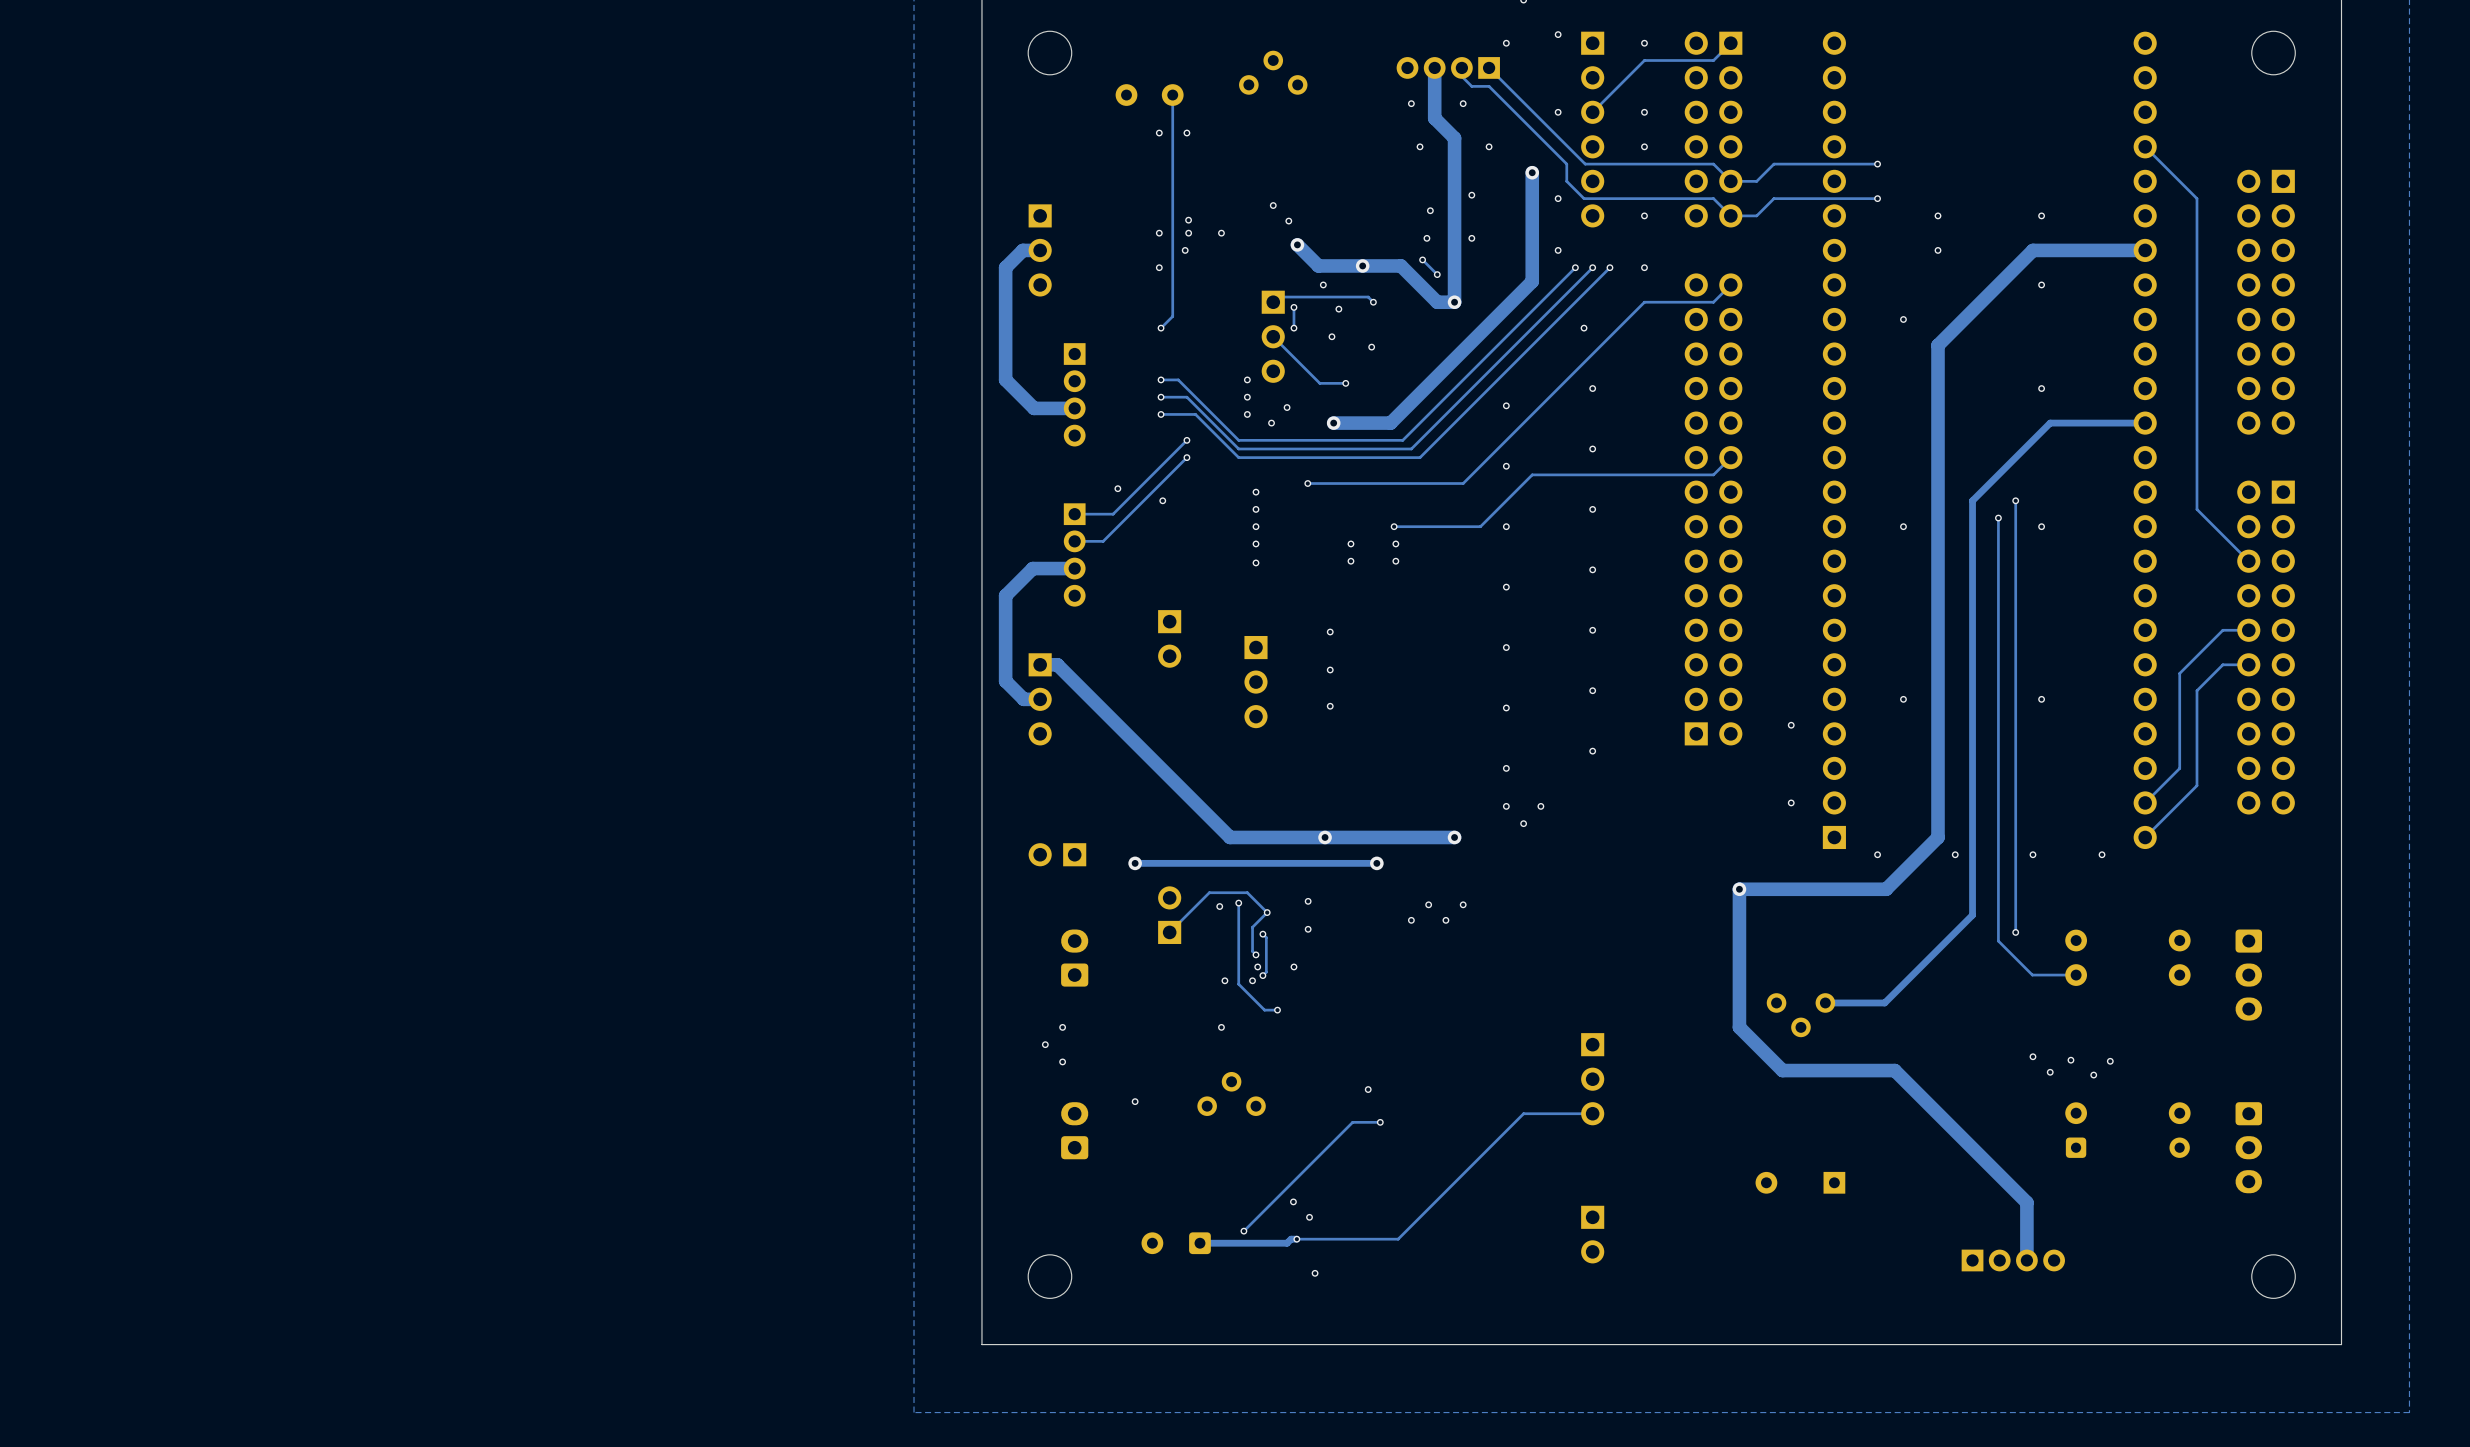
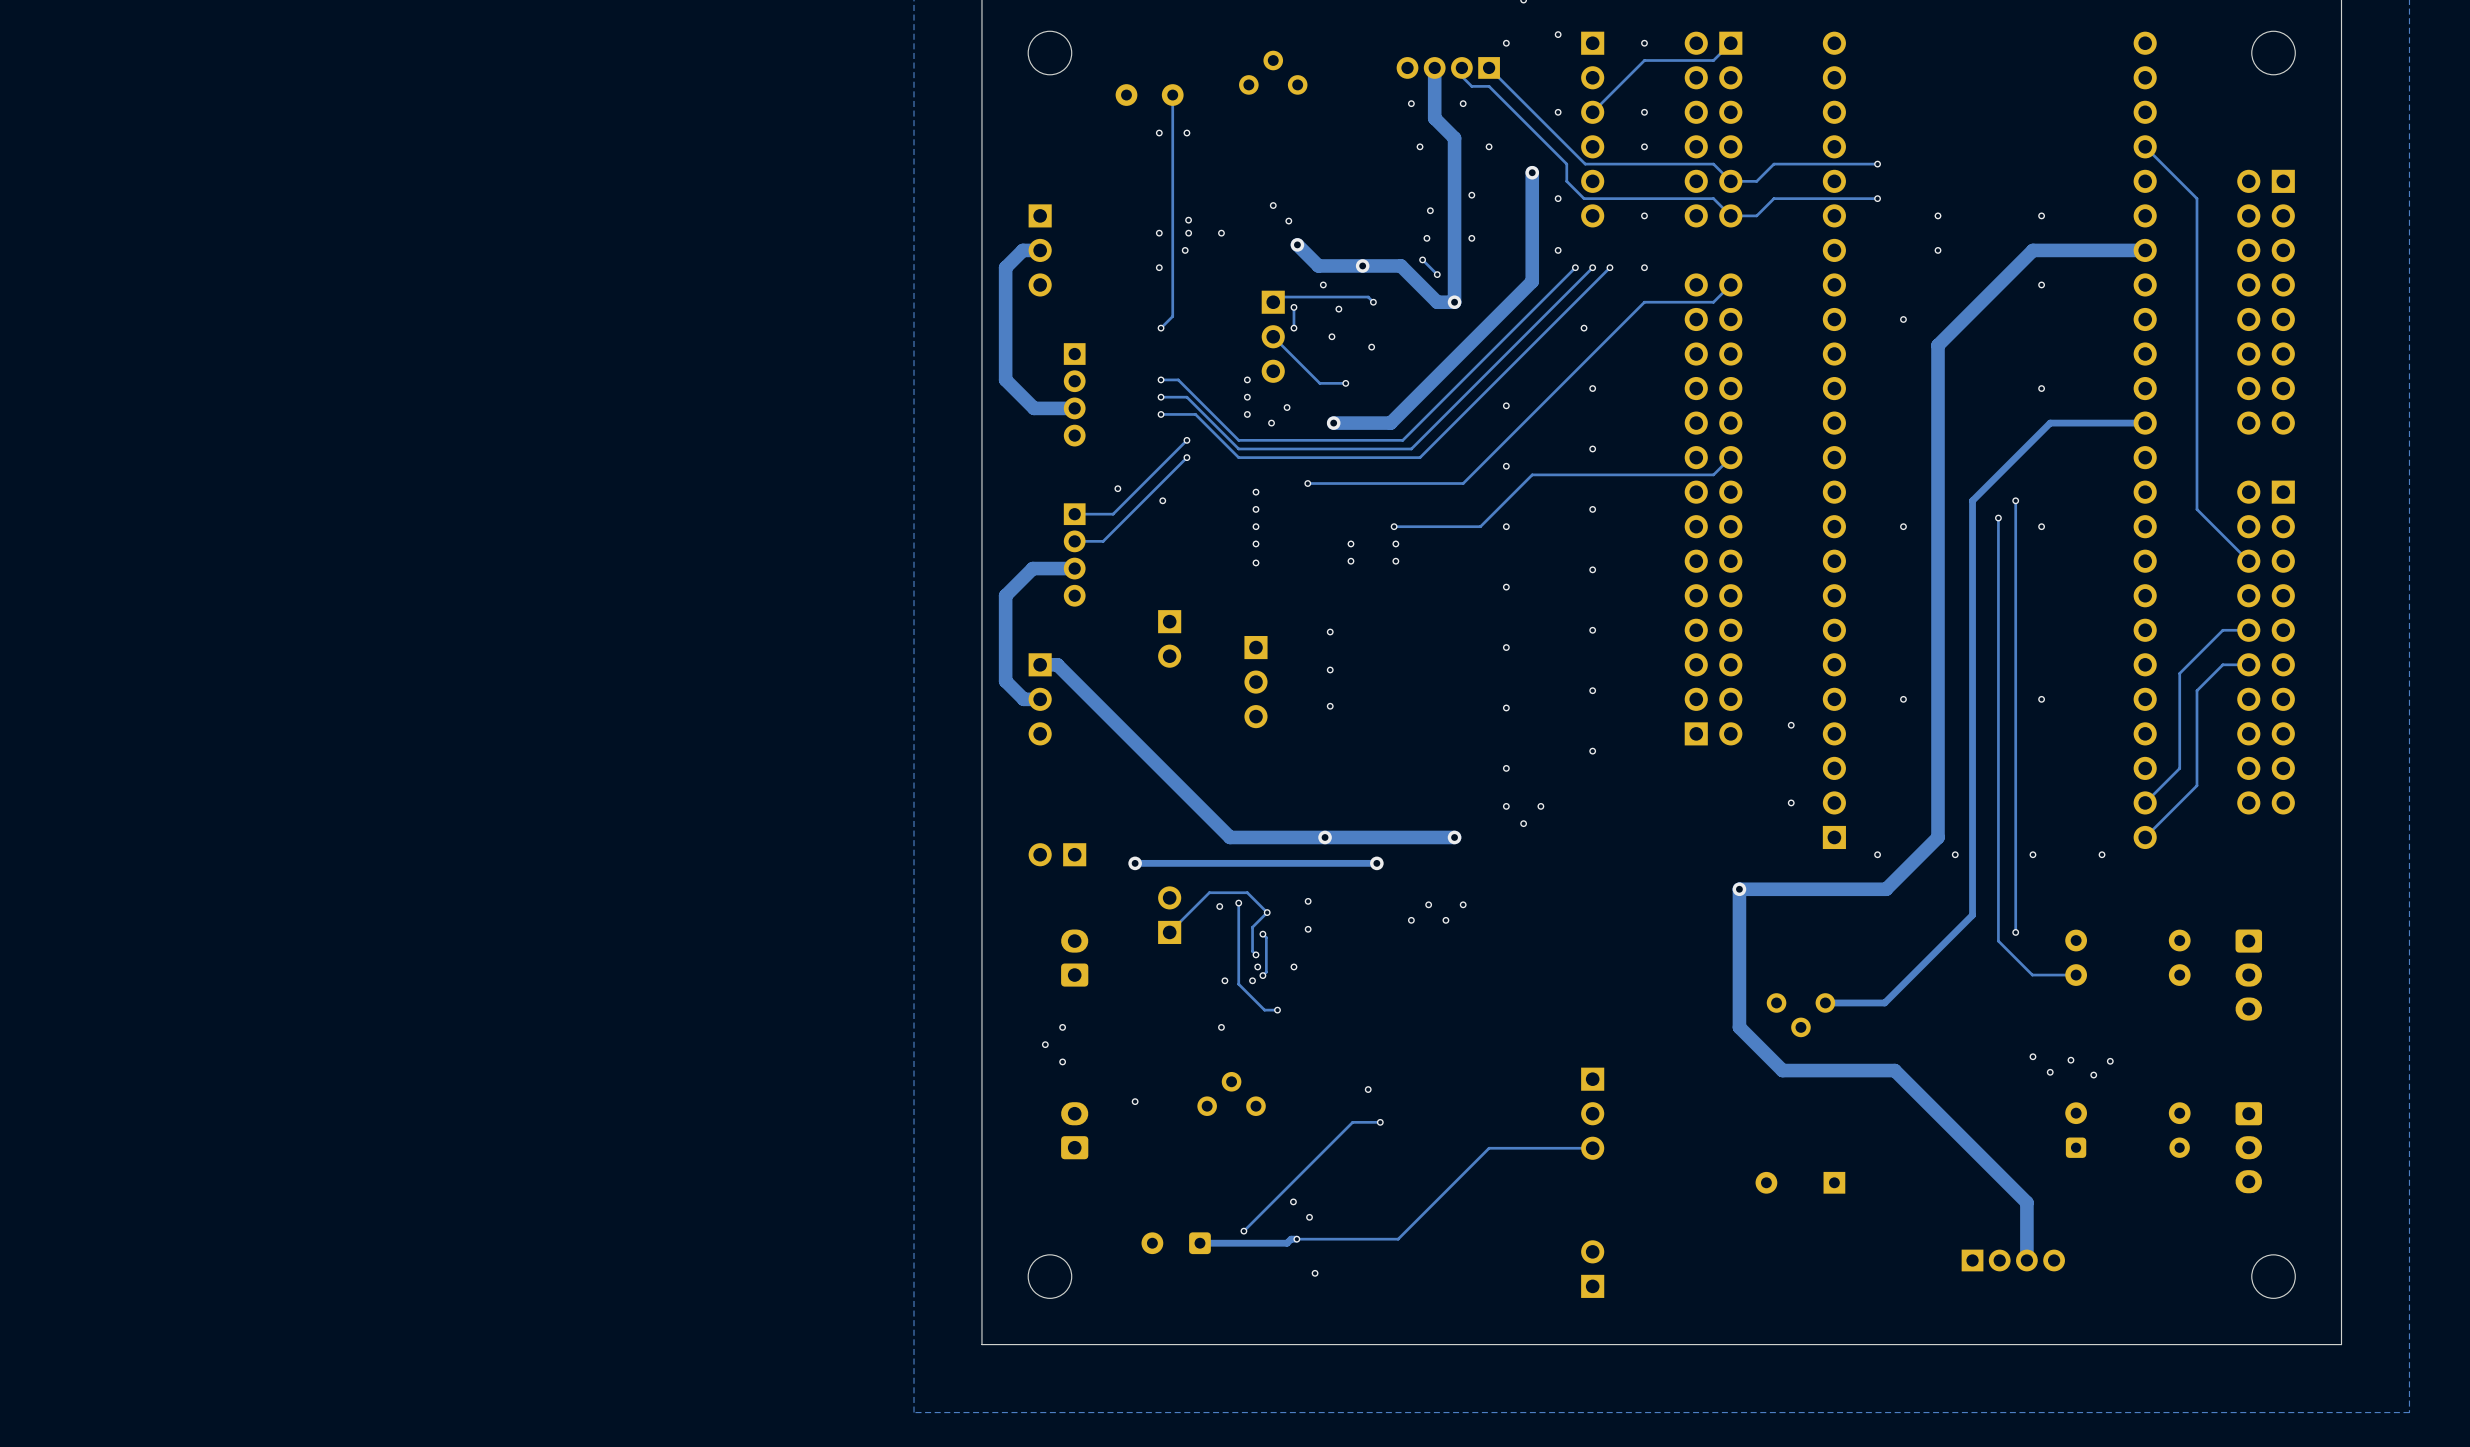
part position: (1592, 1079) -> (1592, 1113)
track: (1592, 1113) (1523, 1113) (1489, 1148) -> (1592, 1148) (1489, 1148)
part rotation: 0° (1592, 1234) -> 180° (1592, 1269)

